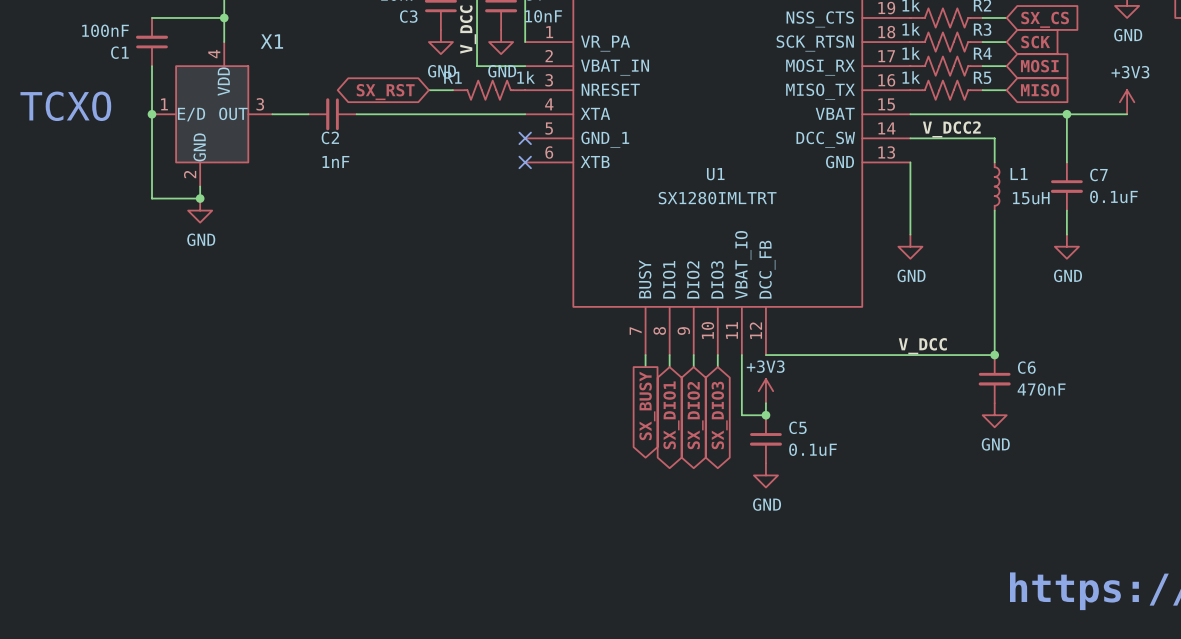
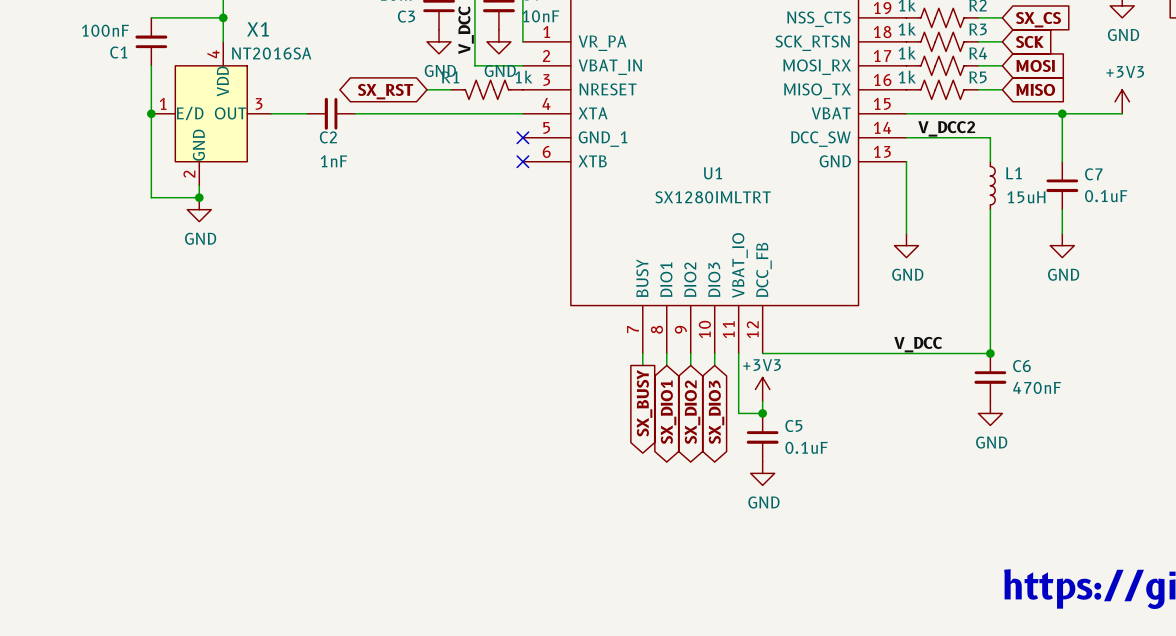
X1 name position: X1 (271, 41) -> X1 (257, 29)
X1 text: none -> NT2016SA (271, 53)
text: TCXO (65, 106) -> none

